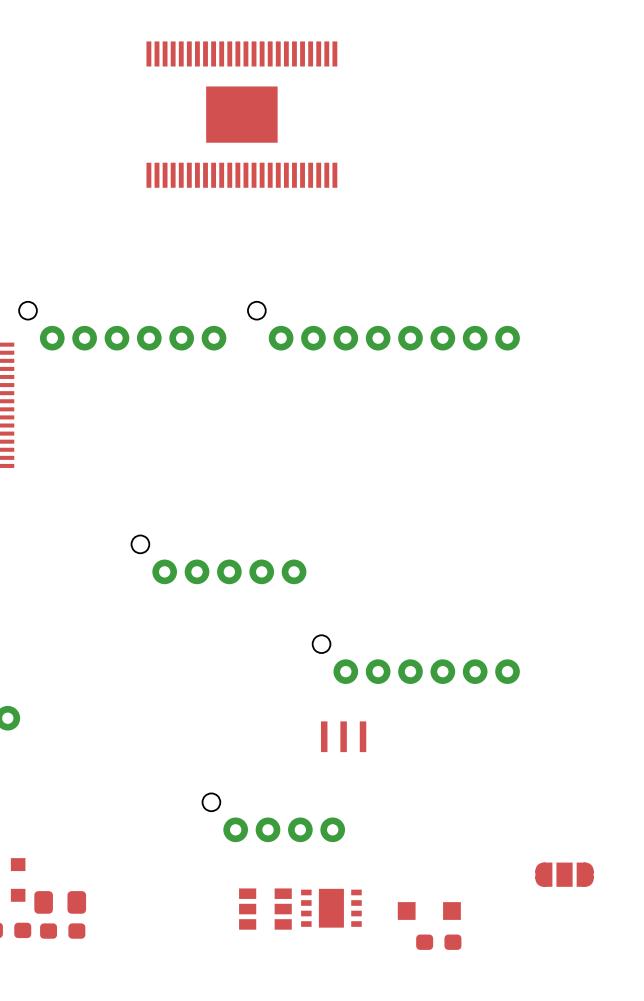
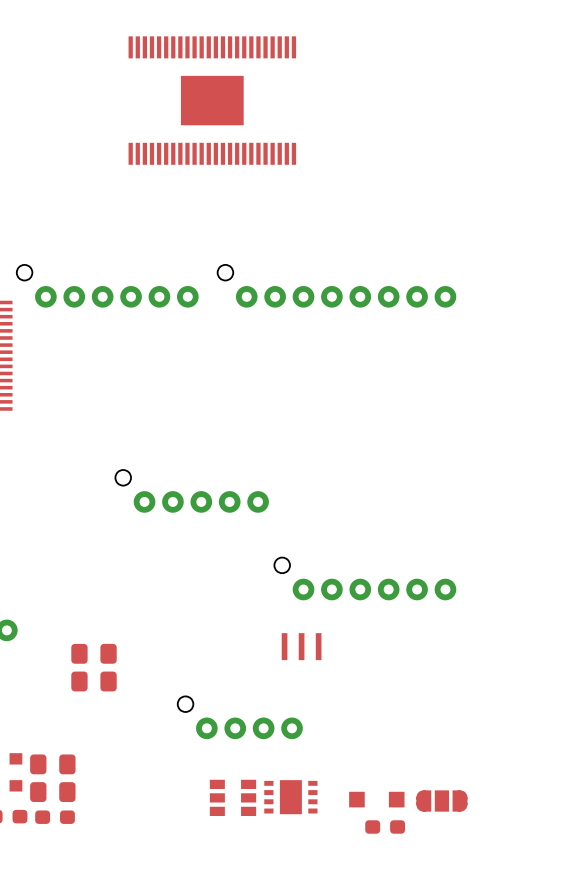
part: none -> (94, 653)
part: none -> (94, 681)
part: none -> (52, 764)
part position: (564, 874) -> (441, 801)

